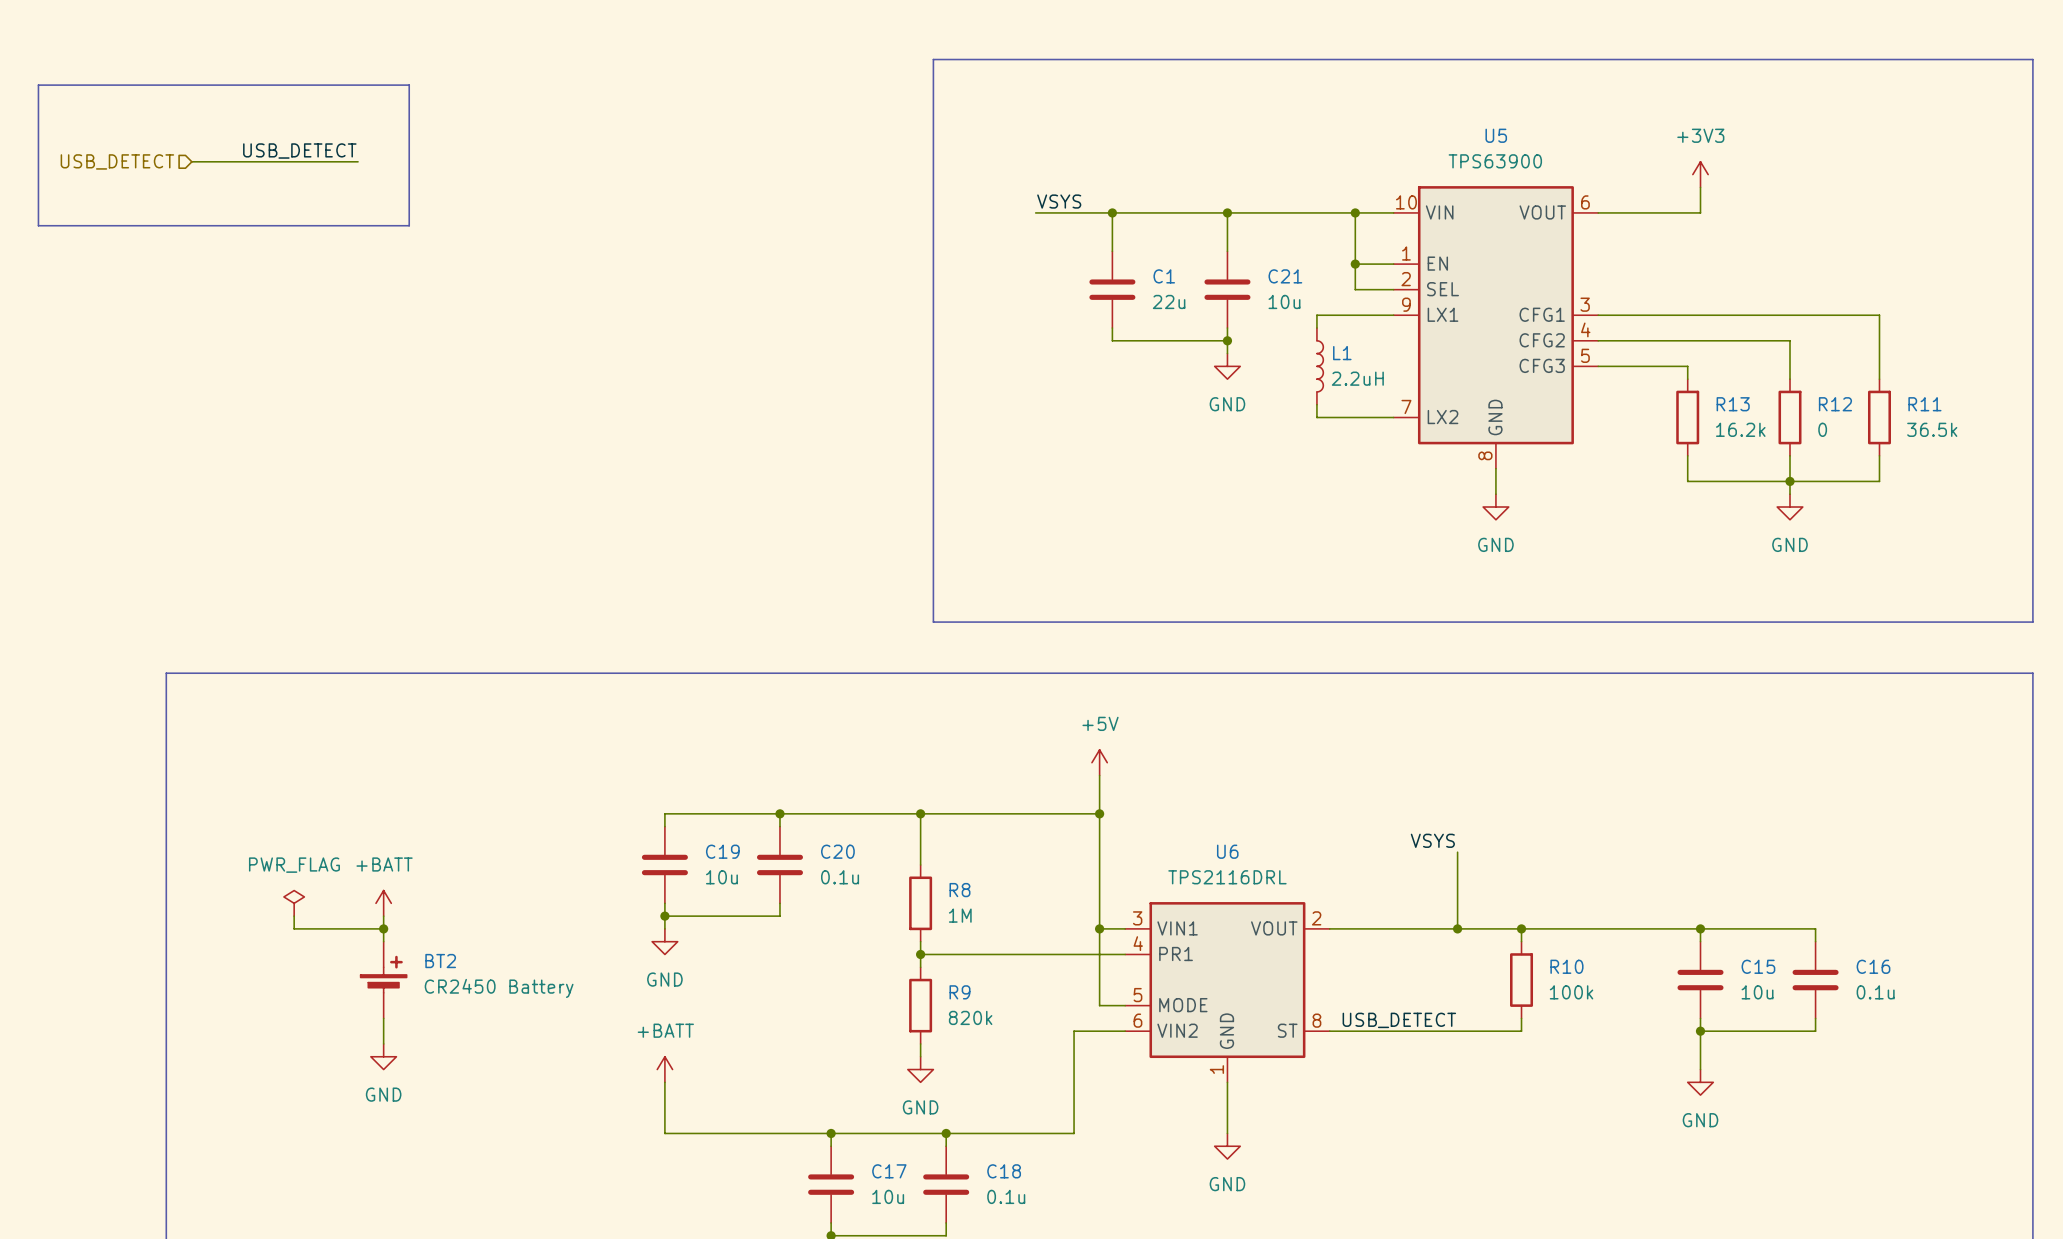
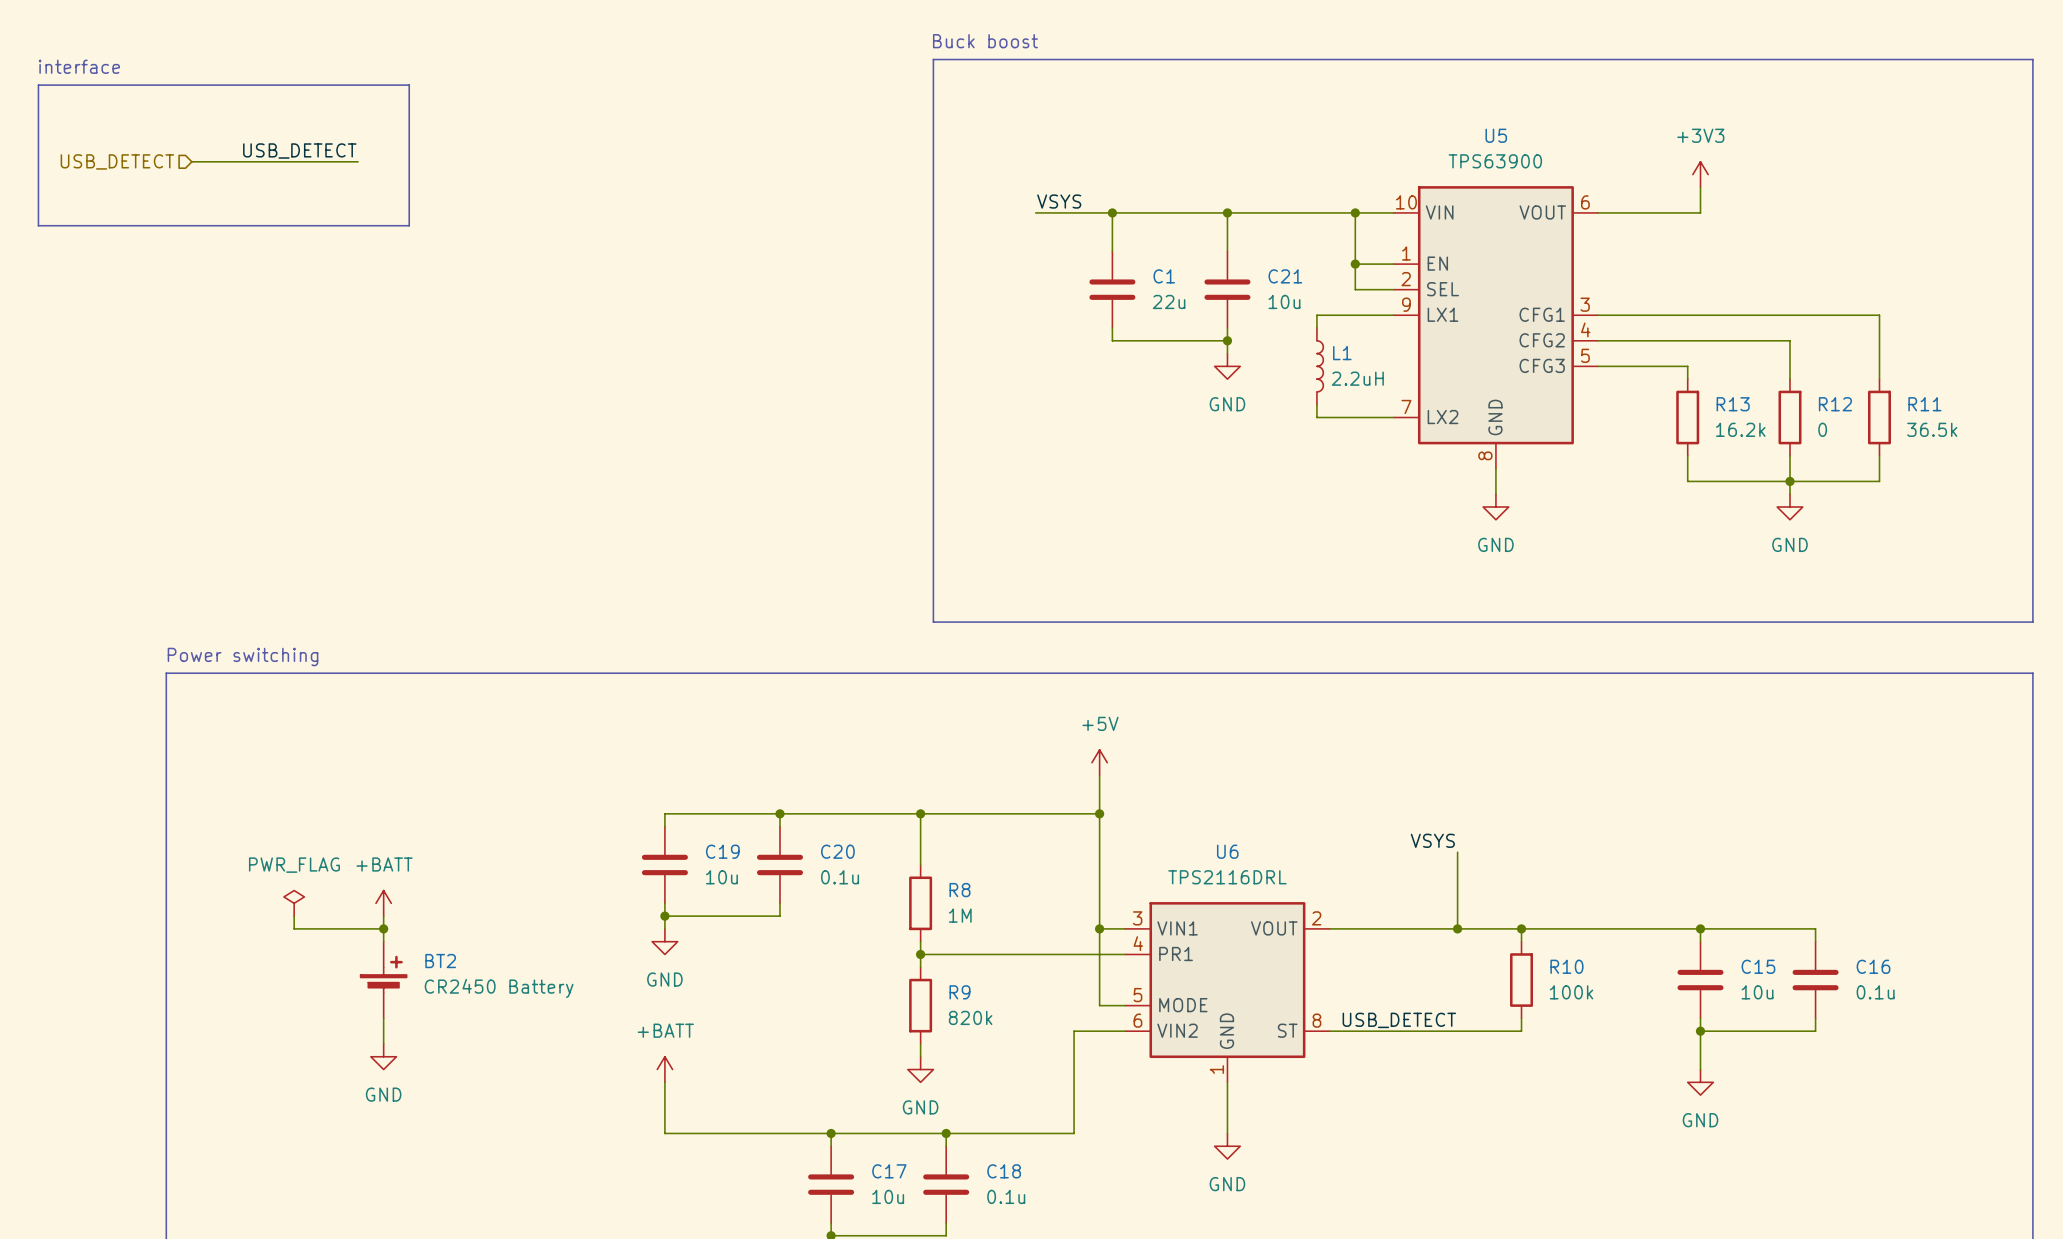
text: none -> Buck boost (985, 41)
text: none -> interface (79, 66)
text: none -> Power switching (243, 657)

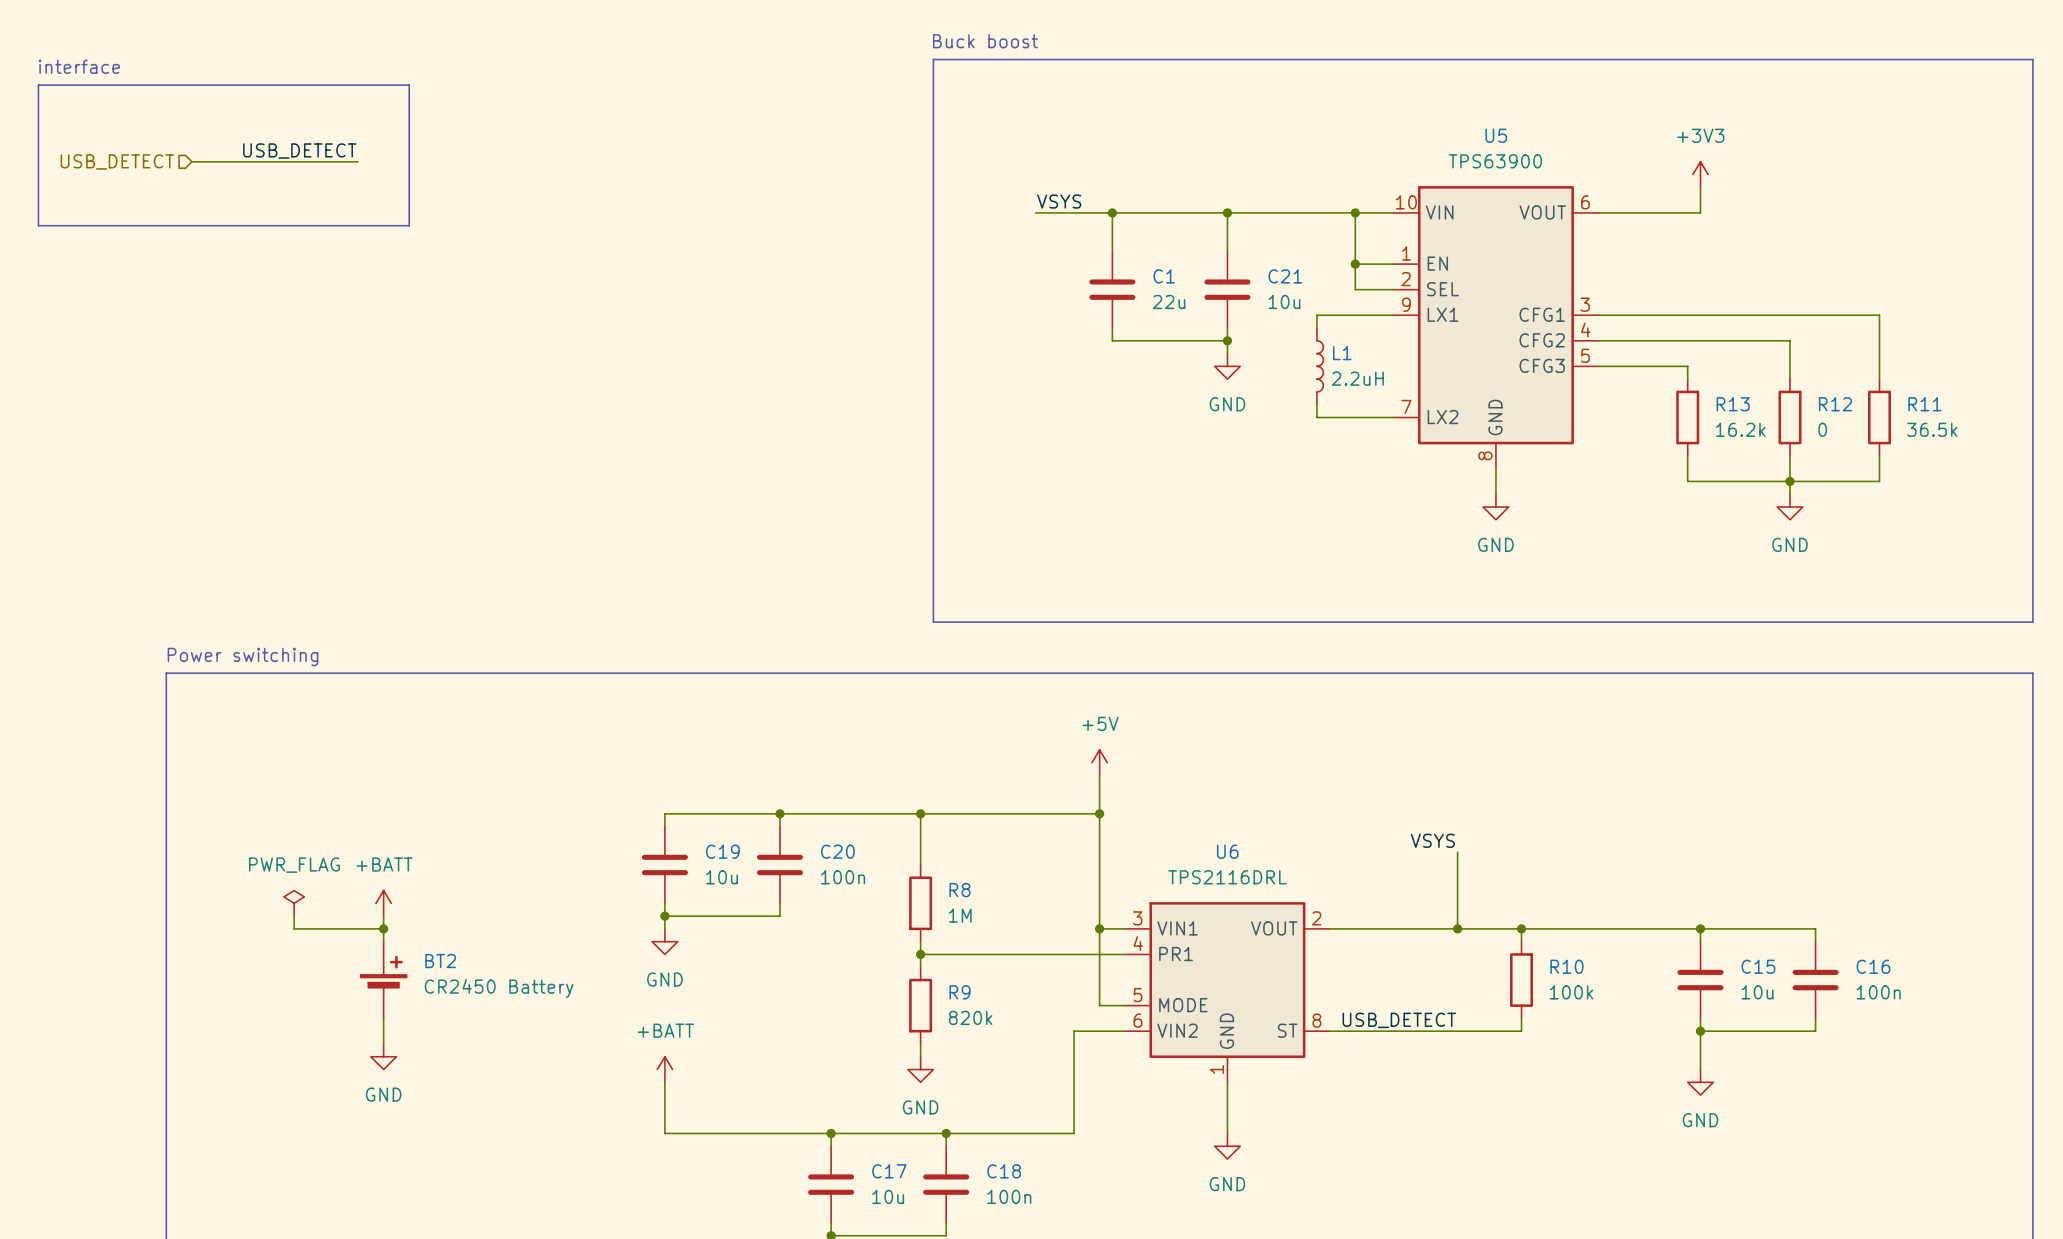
C20 value: 0.1u (840, 877) -> 100n (843, 877)
C16 value: 0.1u (1875, 992) -> 100n (1878, 992)
C18 value: 0.1u (1006, 1196) -> 100n (1009, 1196)

